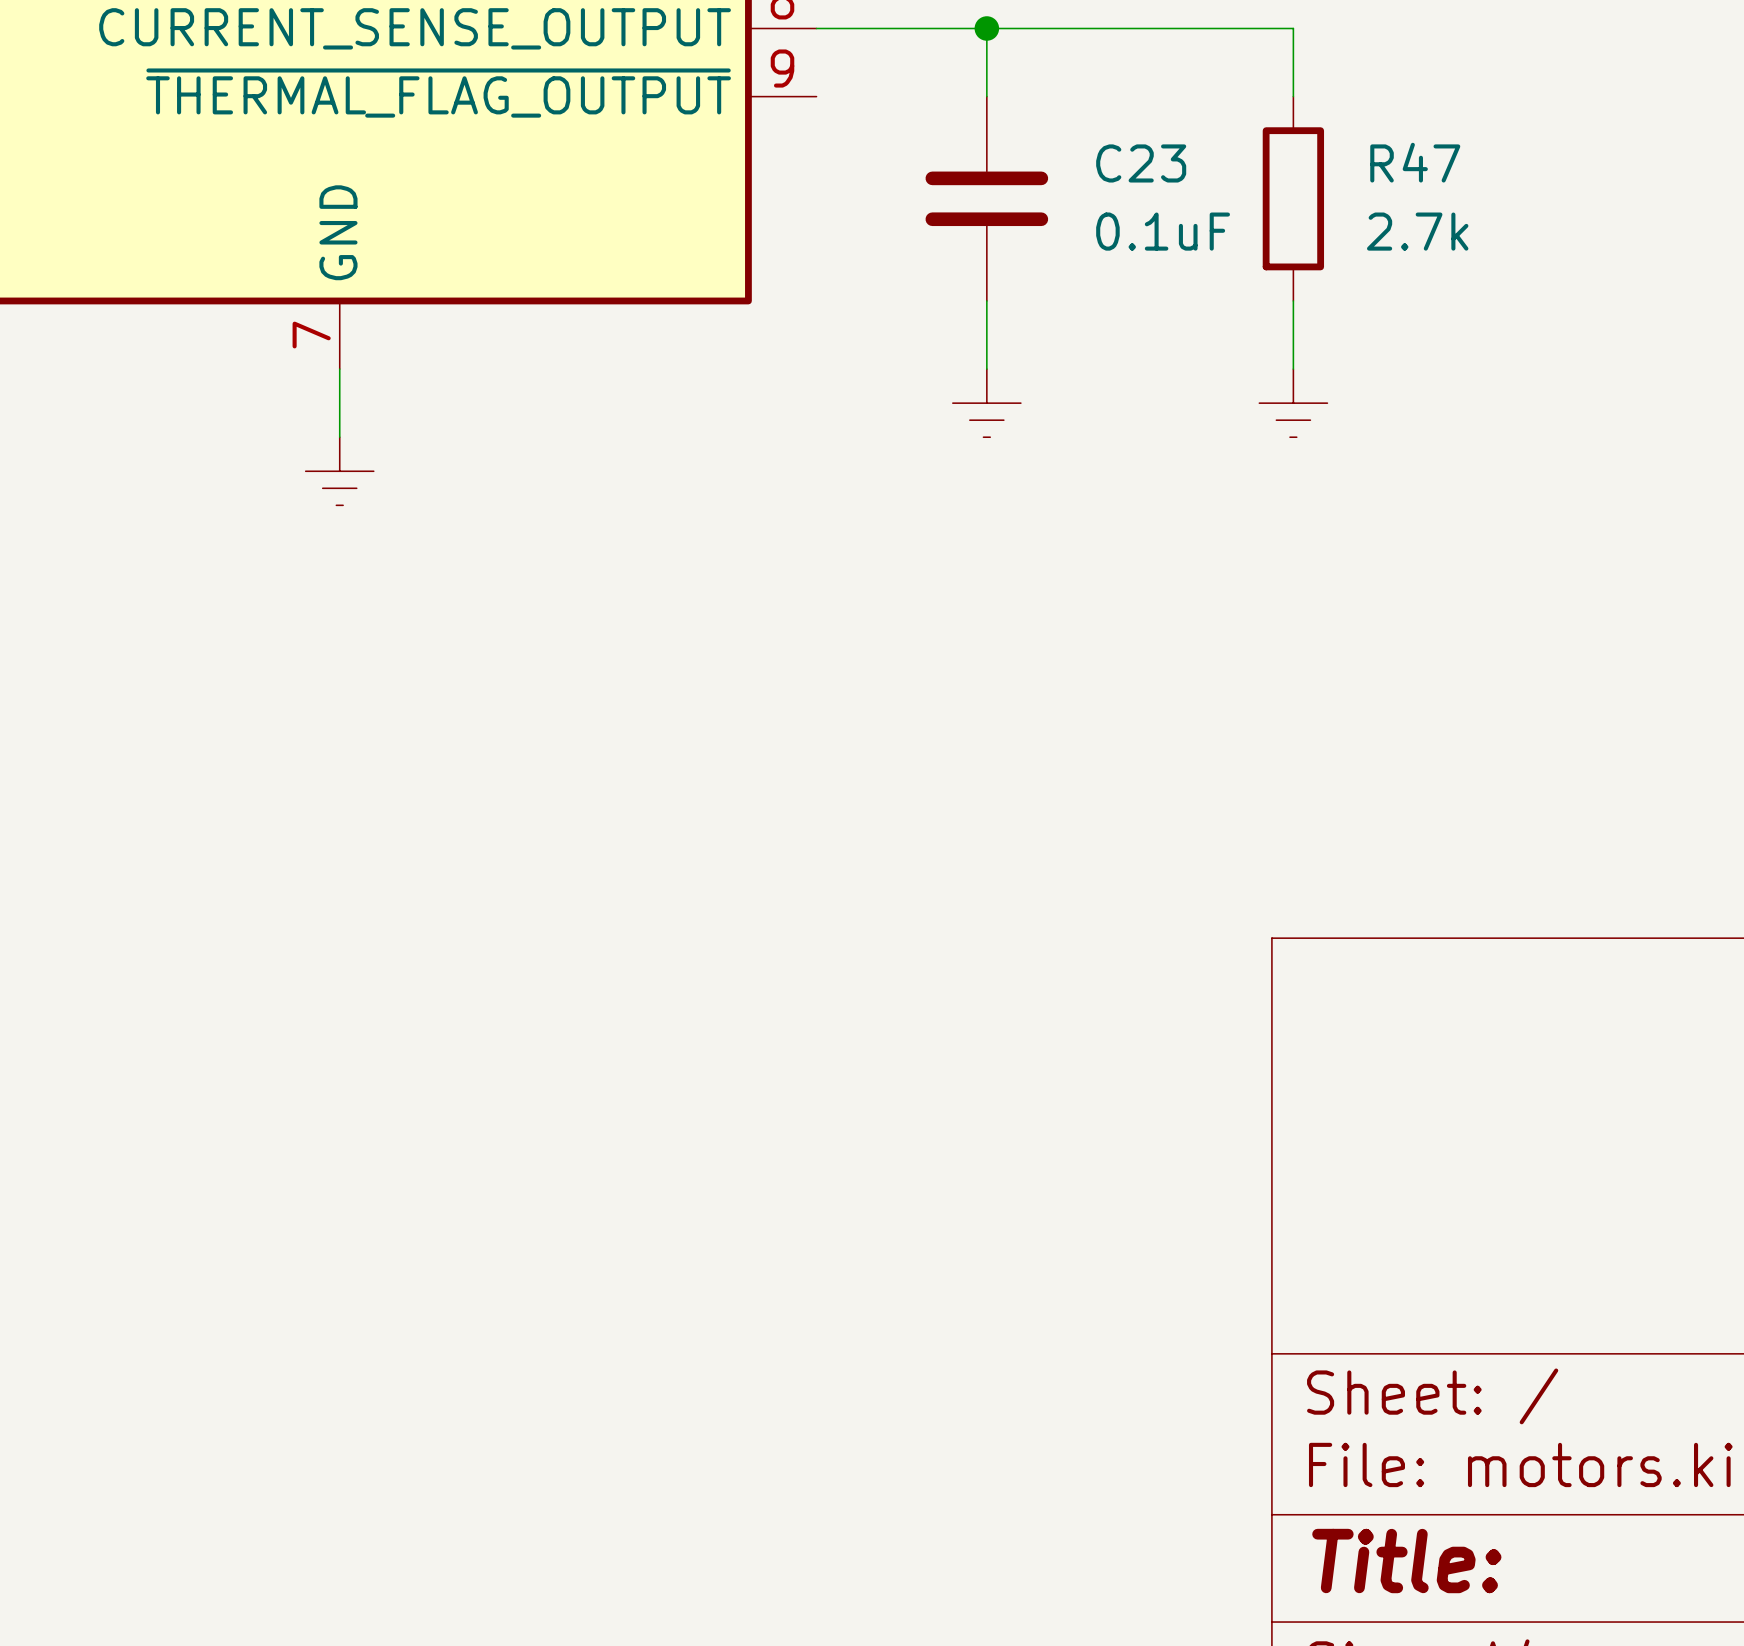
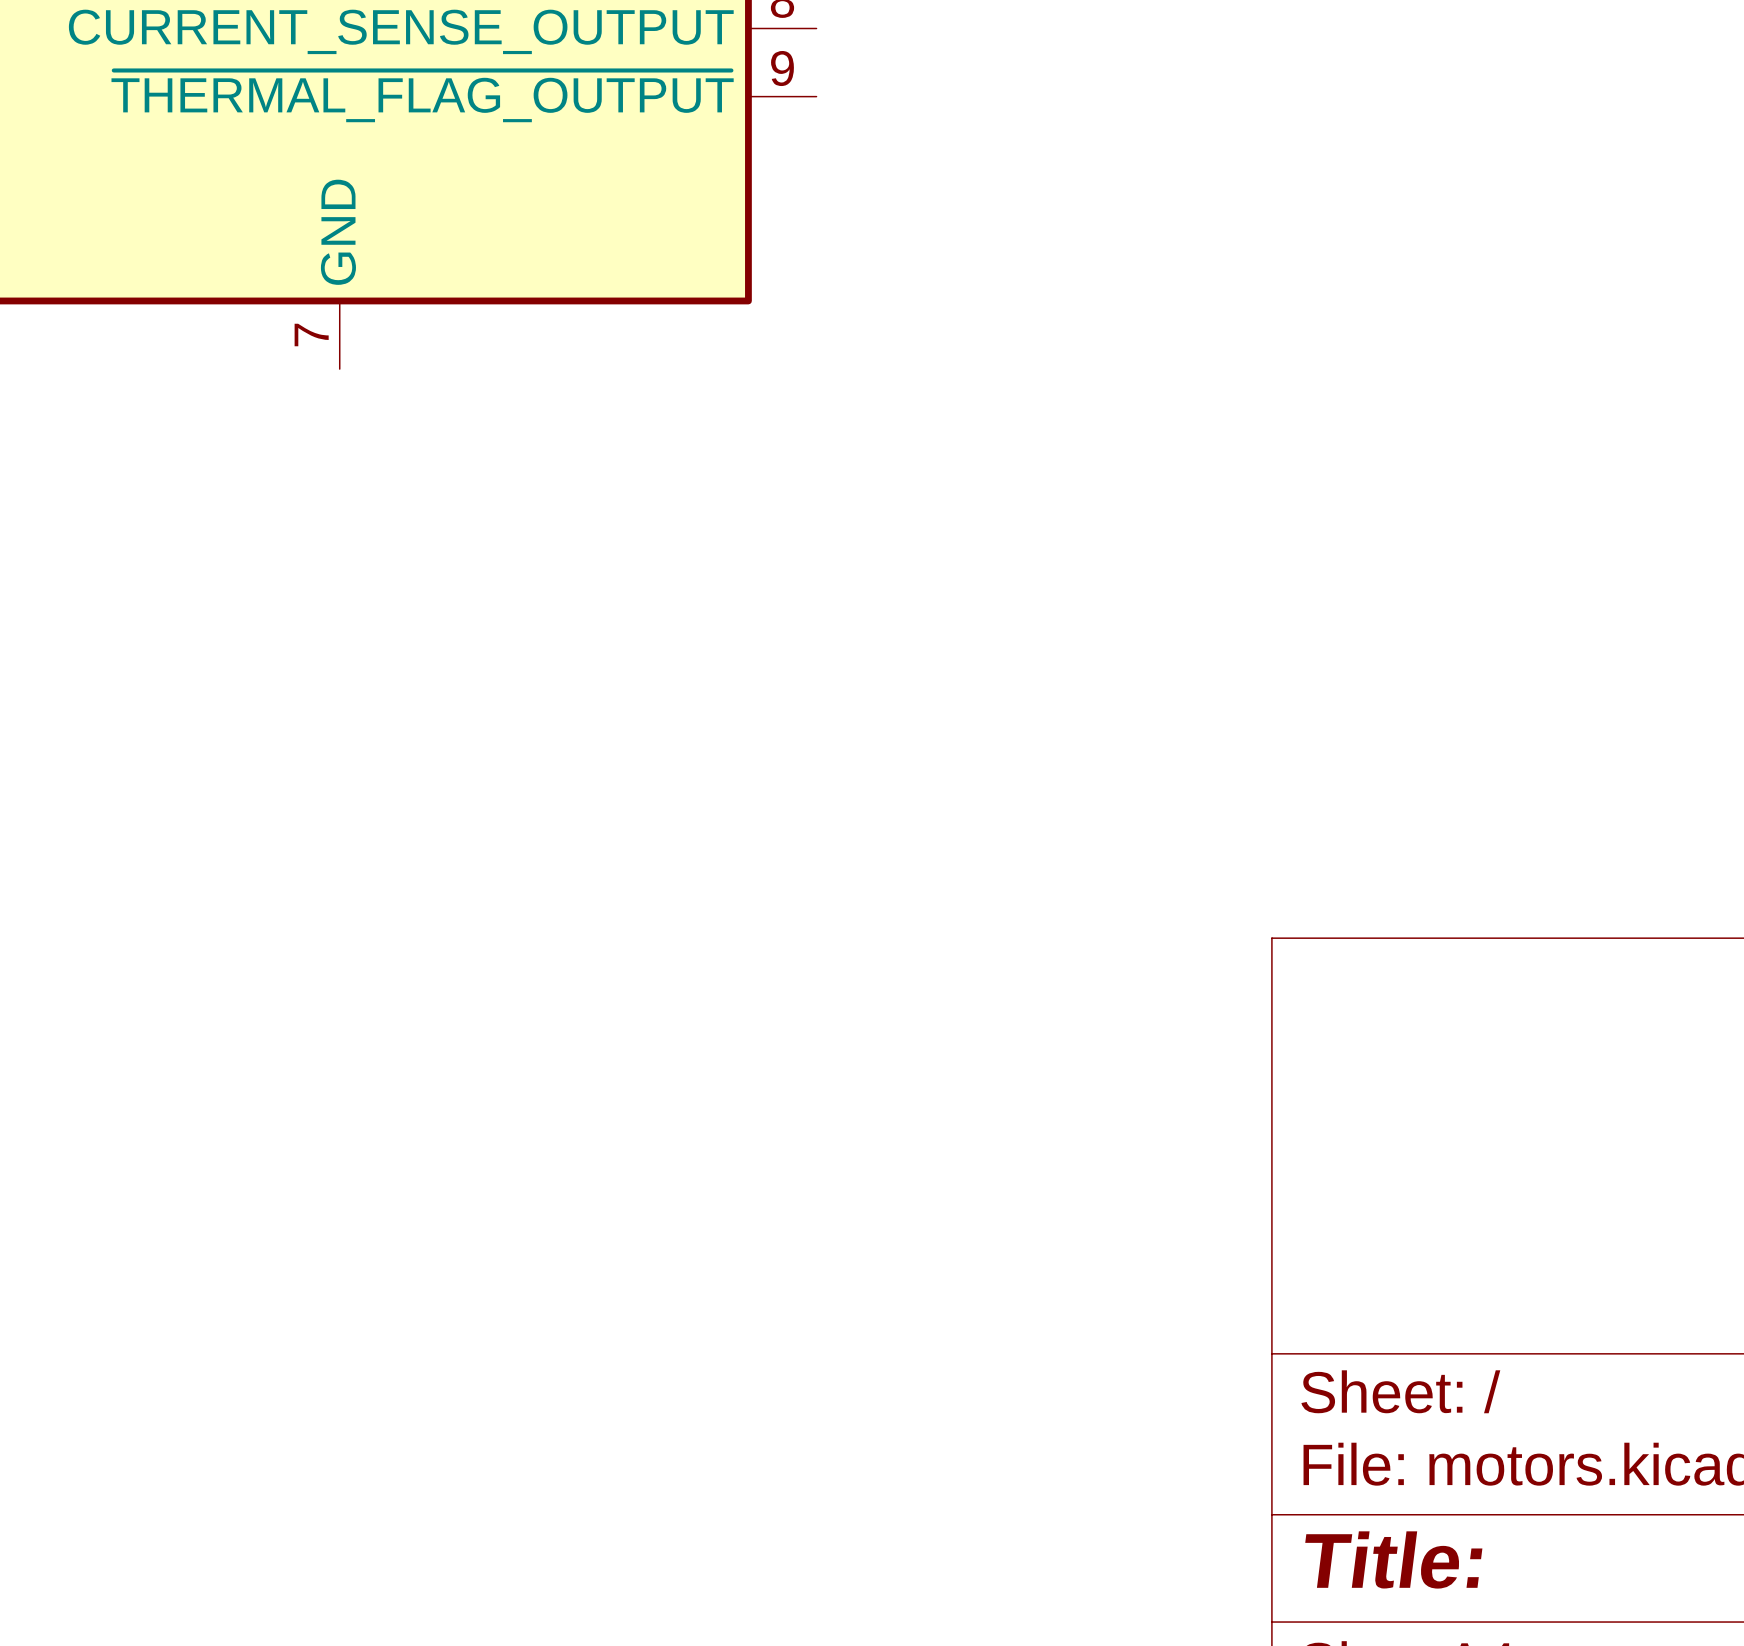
wire: (816, 28) (1293, 28) (1293, 96) -> none
wire: (986, 28) (986, 96) -> none
junction: (986, 28) -> none
C23: 0.1uF (986, 198) -> none
R47: 2.7k (1293, 198) -> none
wire: (986, 300) (986, 369) -> none
wire: (1293, 300) (1293, 369) -> none
wire: (339, 369) (339, 437) -> none
power symbol: (986, 403) -> none
power symbol: (1293, 403) -> none
power symbol: (339, 471) -> none

